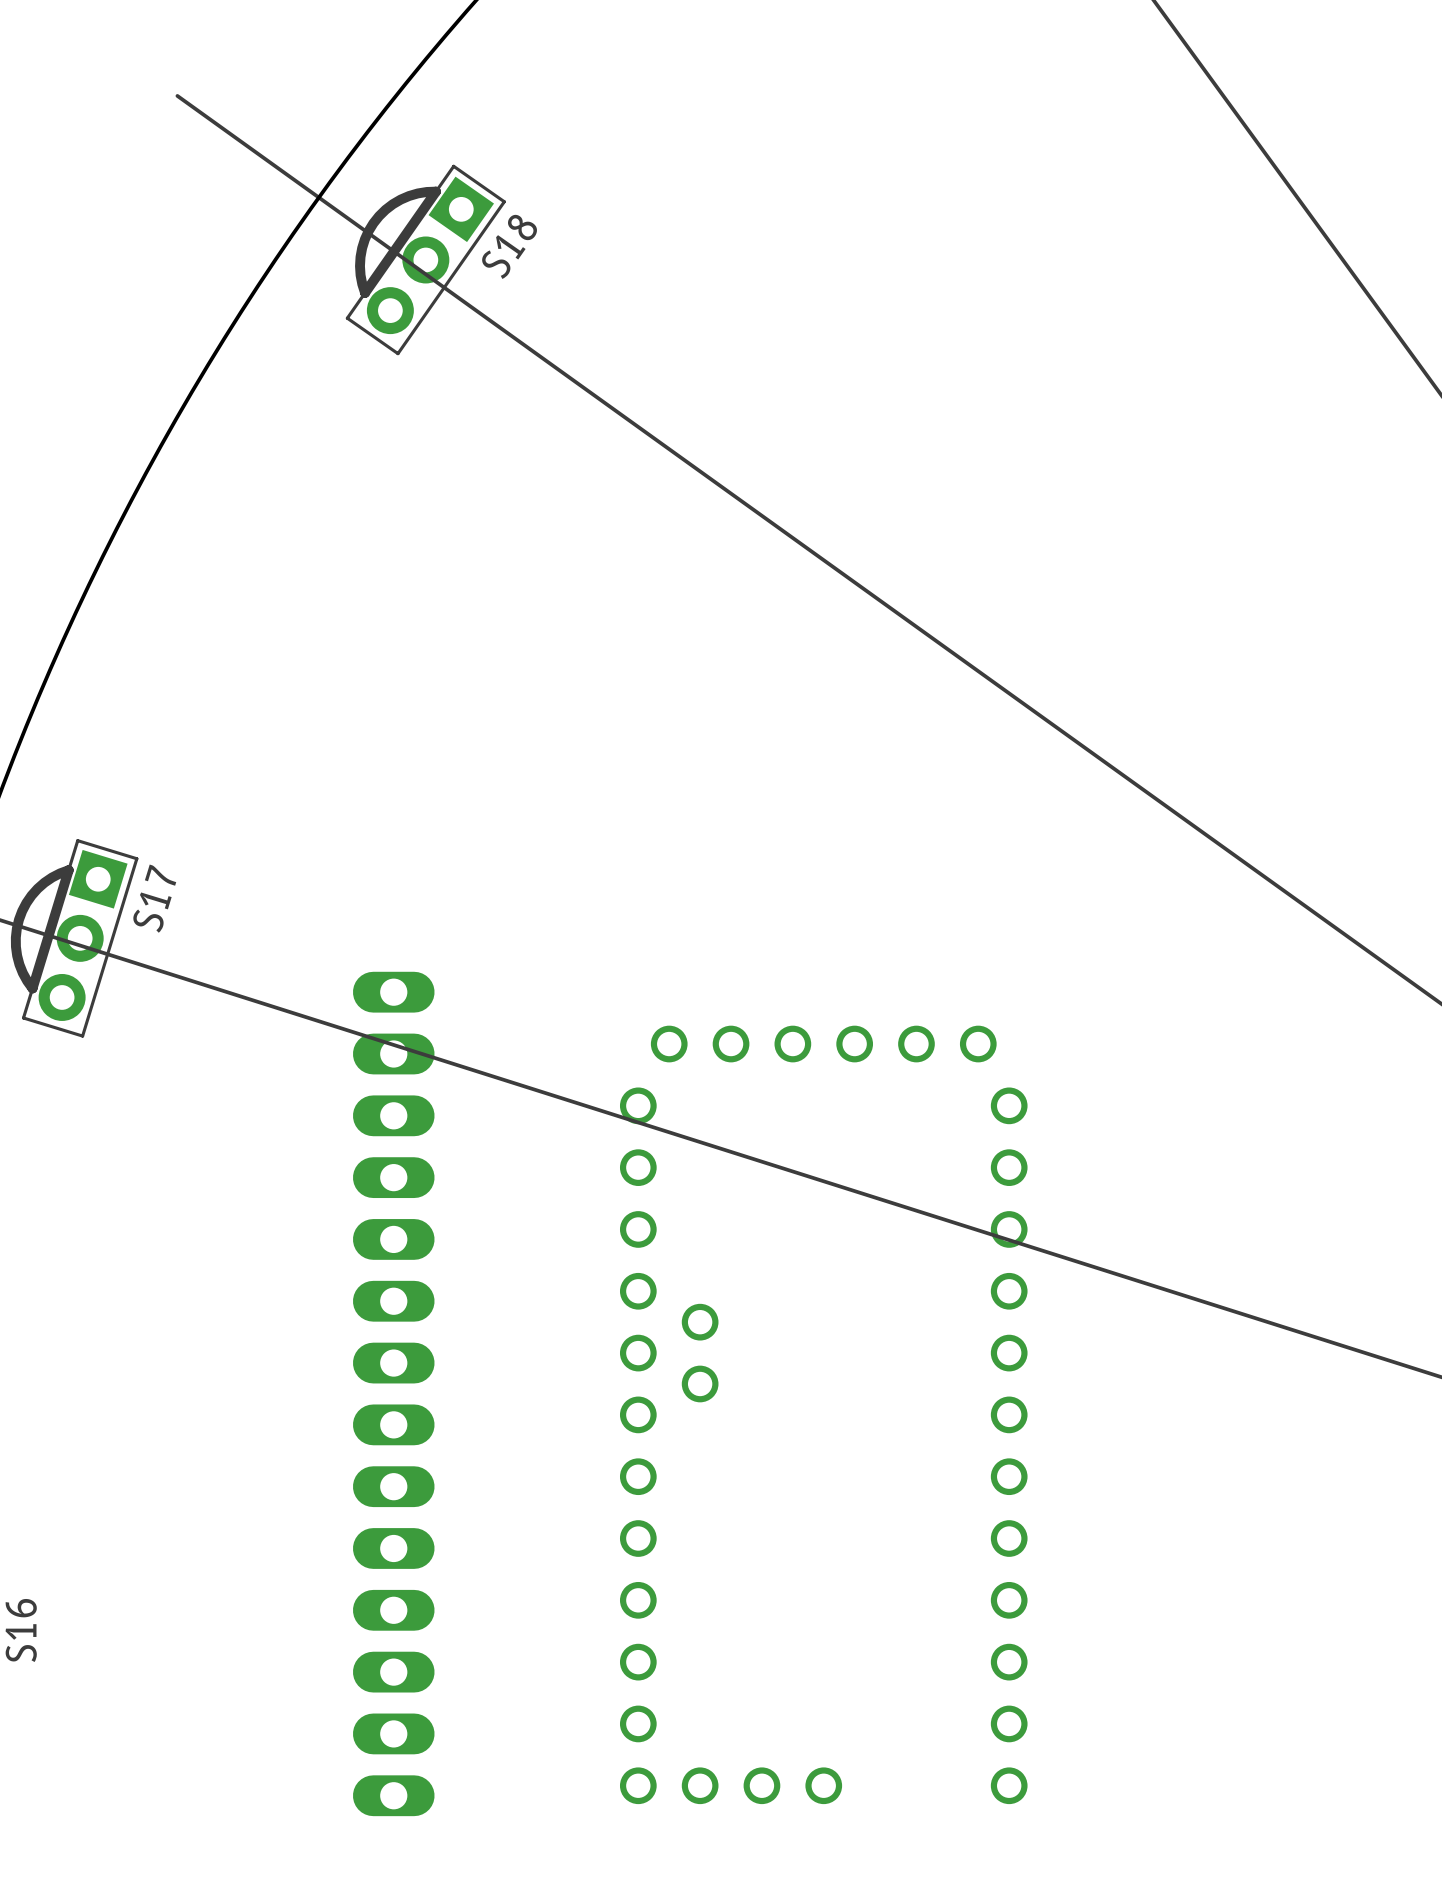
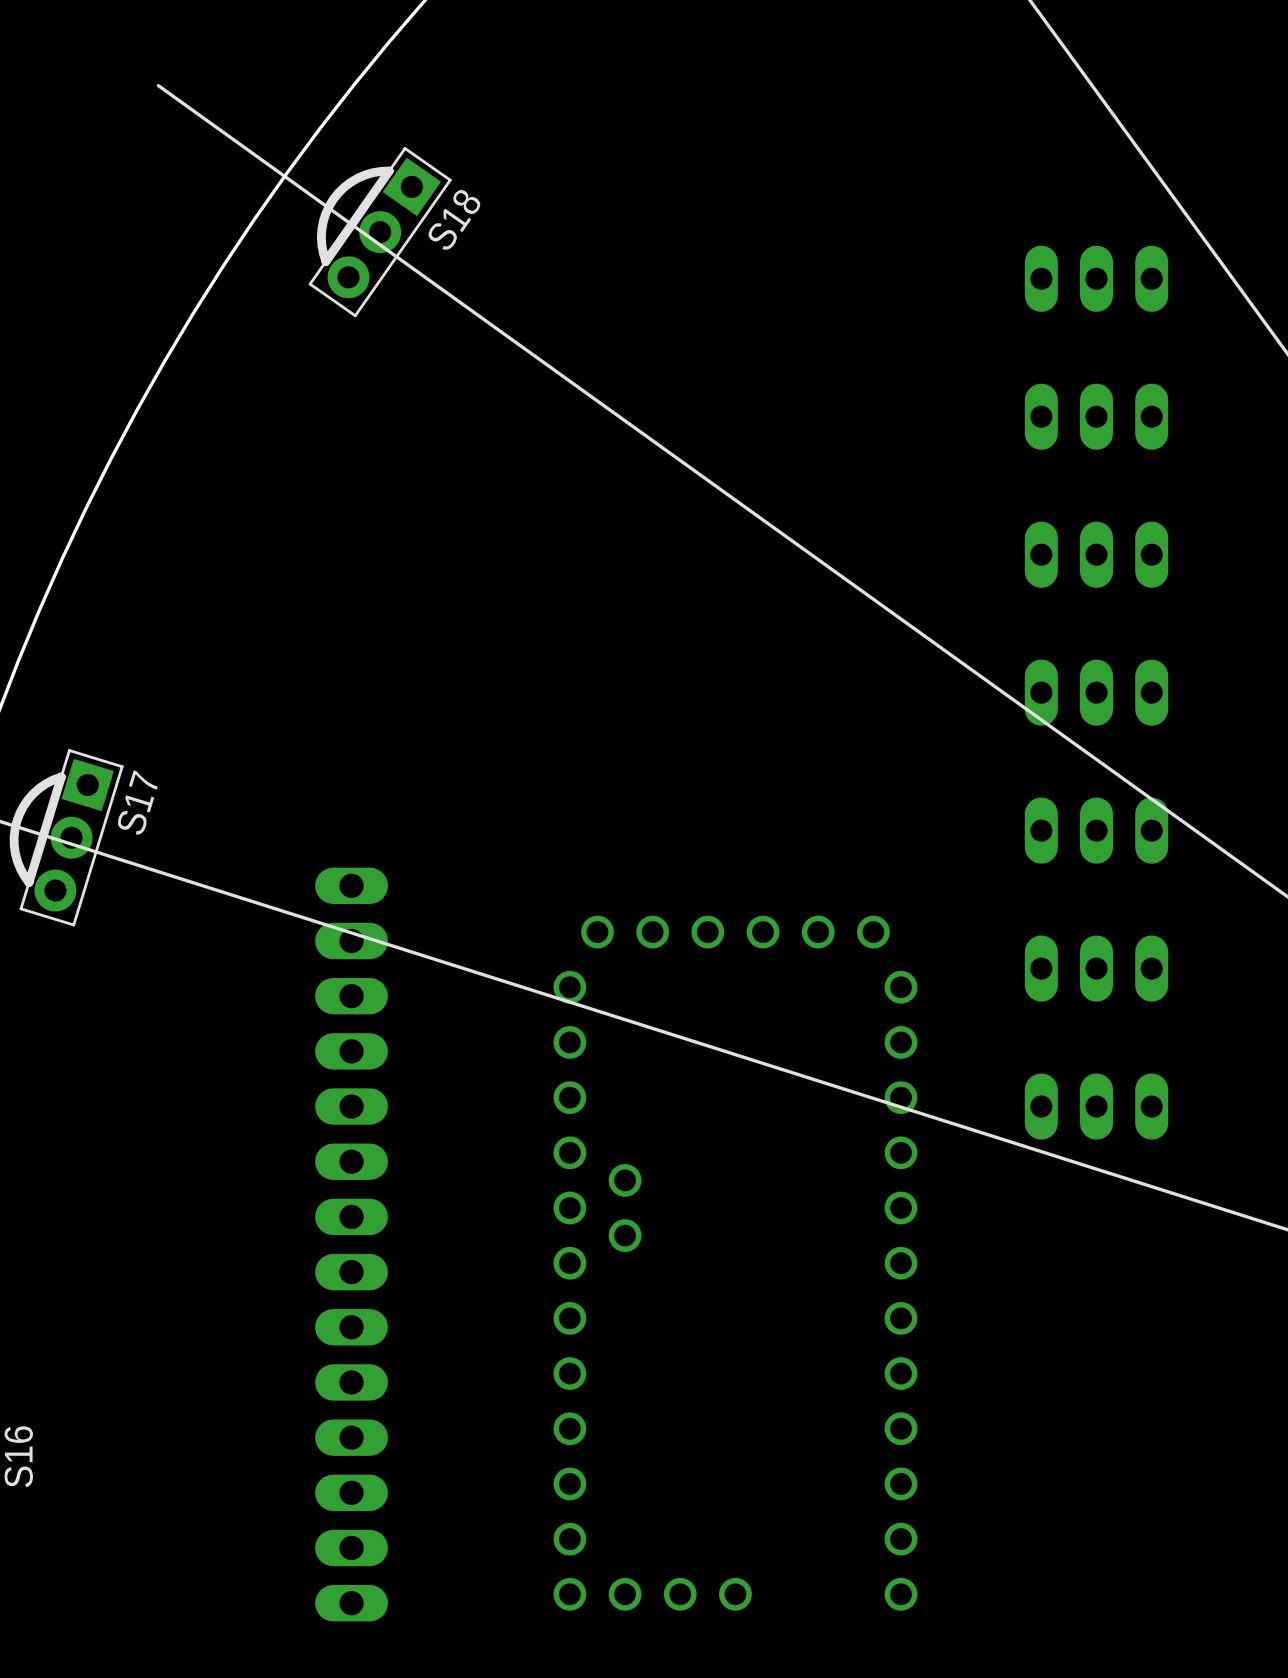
part: none -> (1096, 278)
part: none -> (1096, 416)
part: none -> (1096, 554)
part: none -> (1096, 692)
part: none -> (1096, 830)
part: none -> (1096, 968)
part: none -> (1096, 1106)

